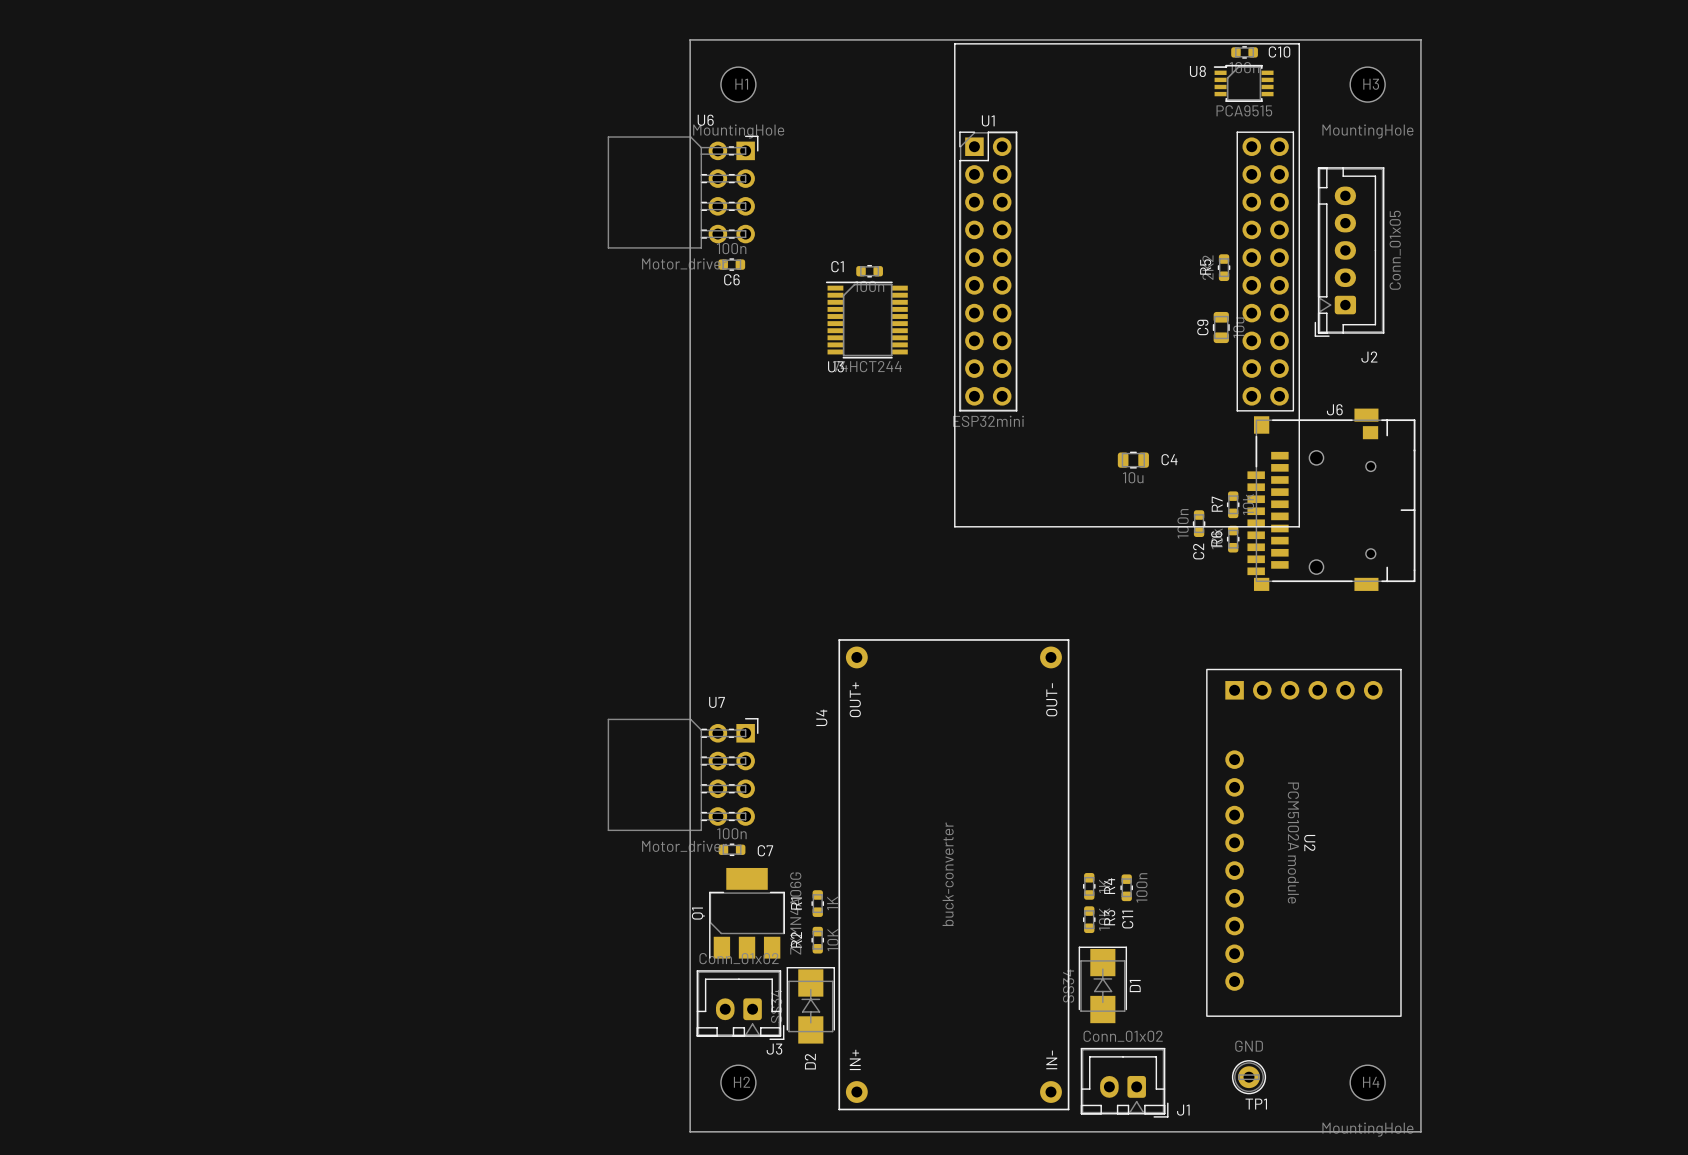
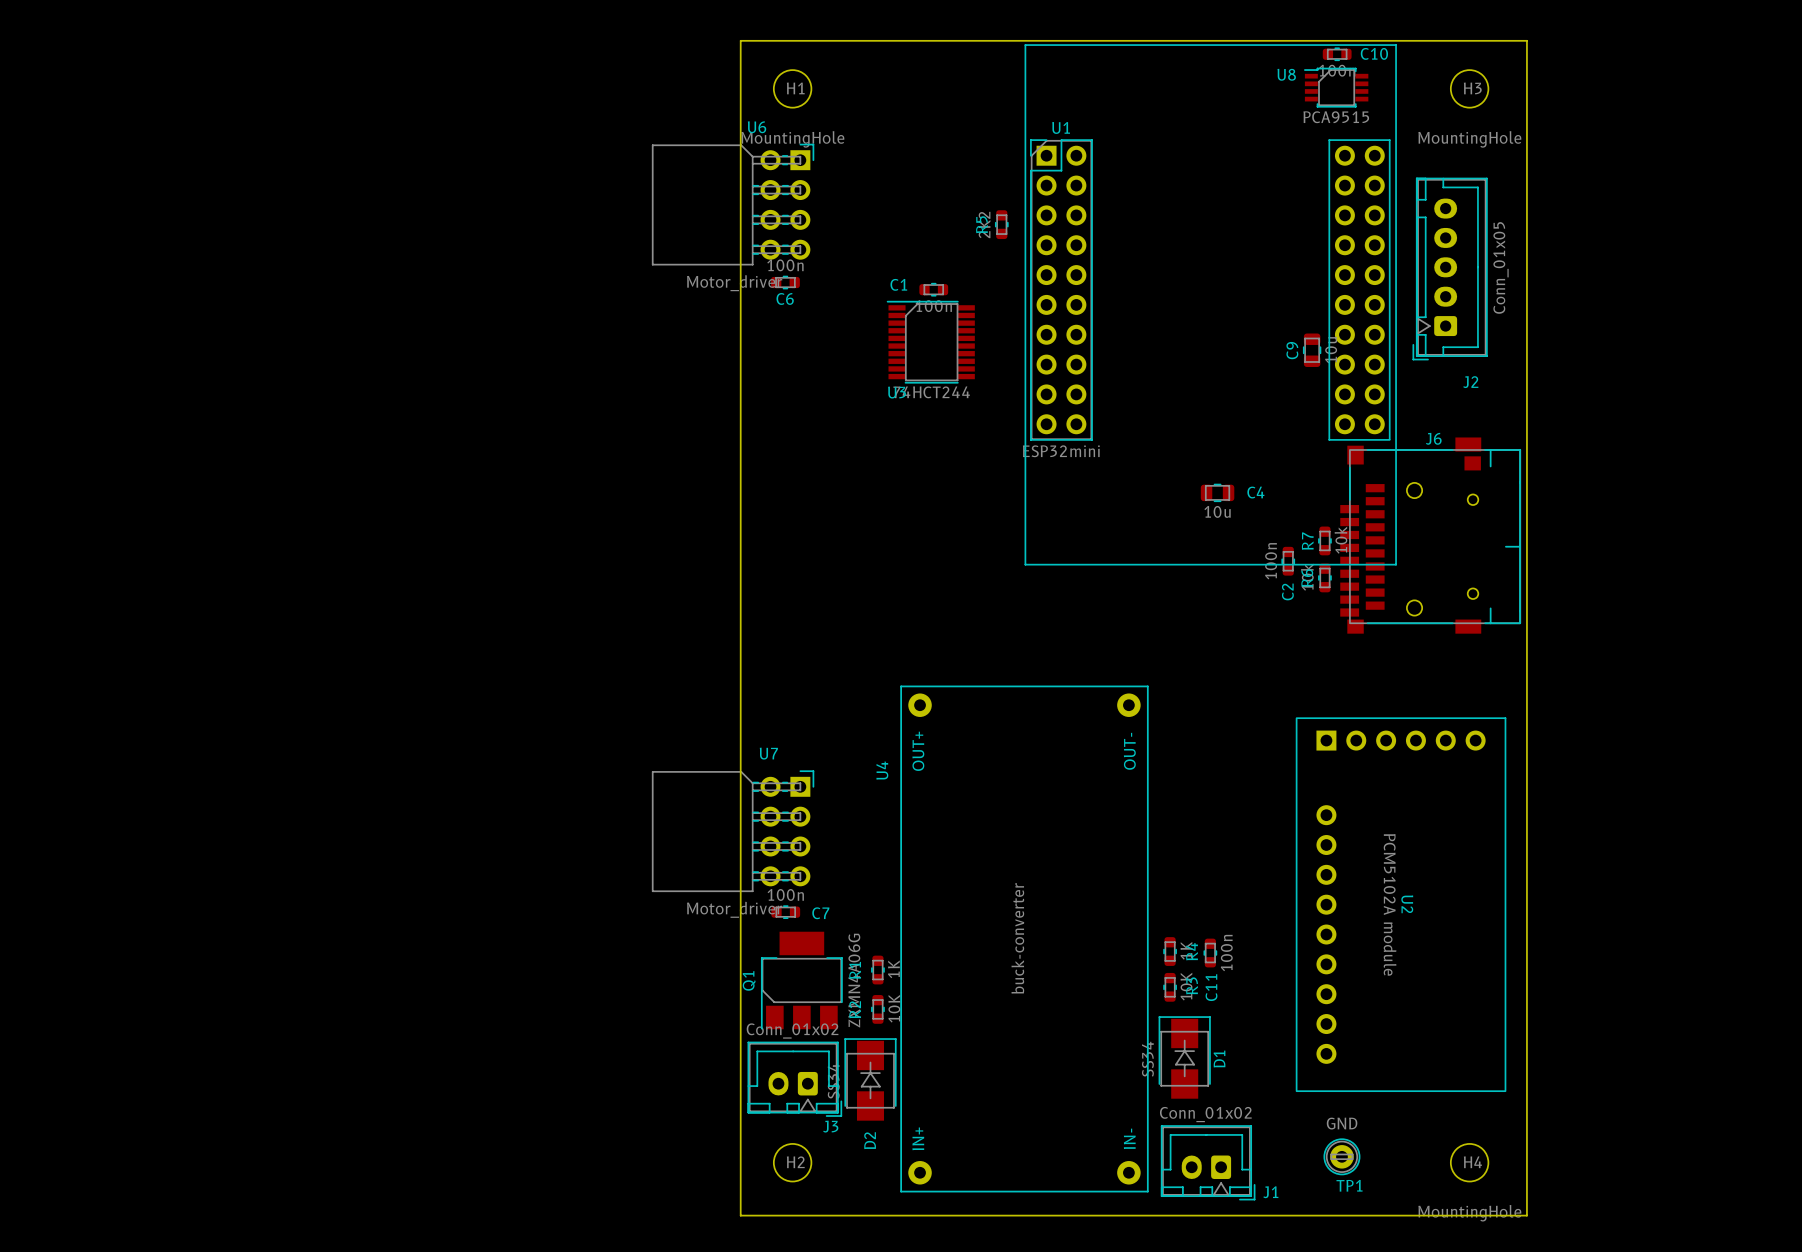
R5 position: (1224, 267) -> (1001, 224)

